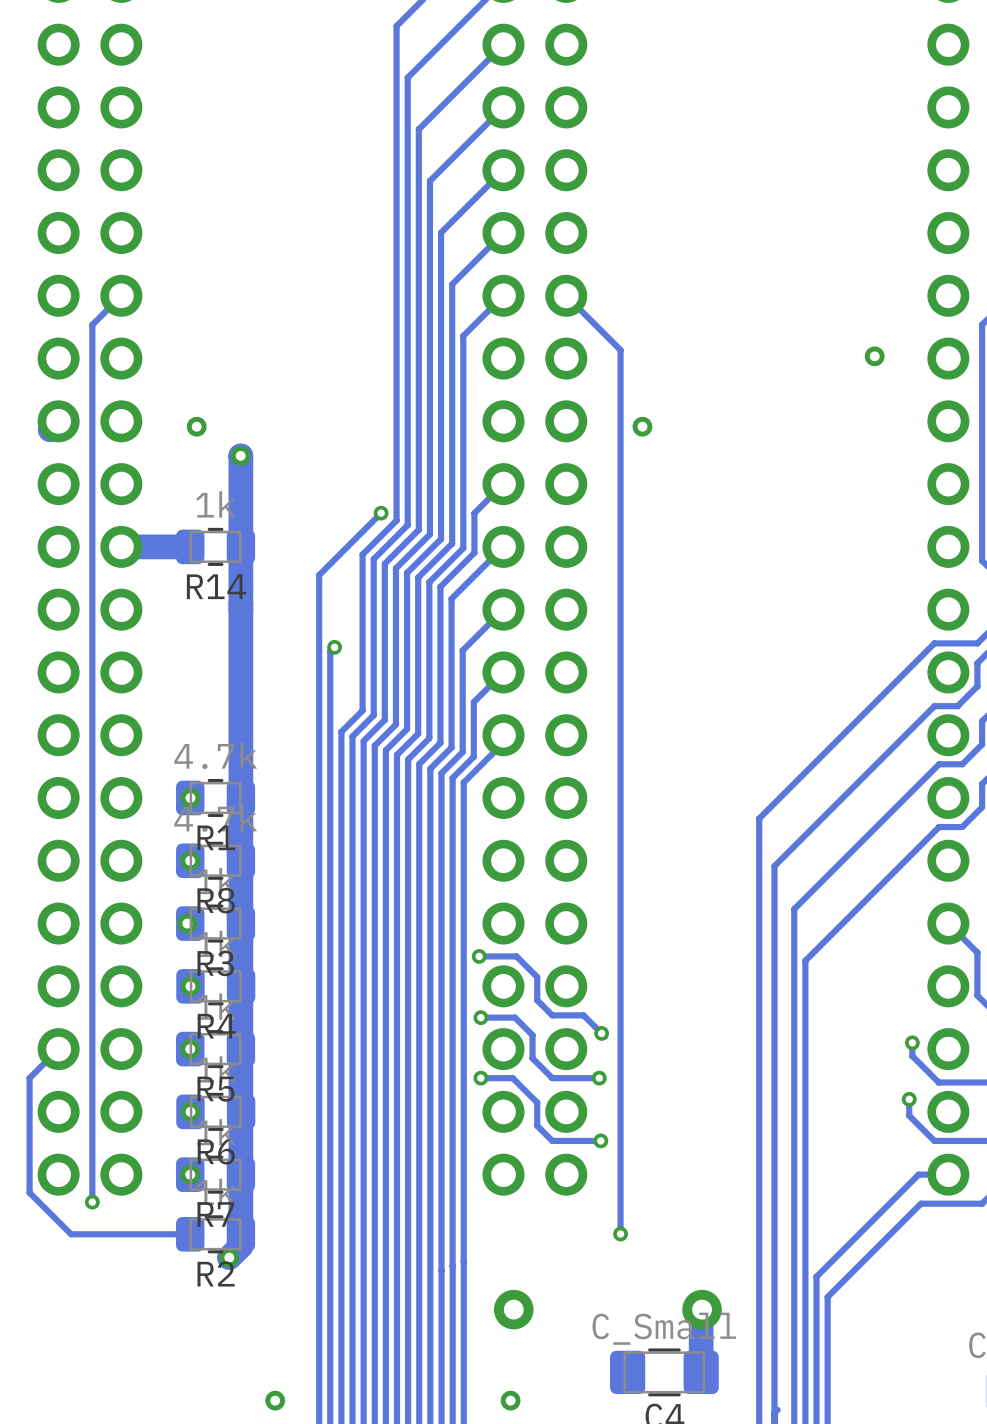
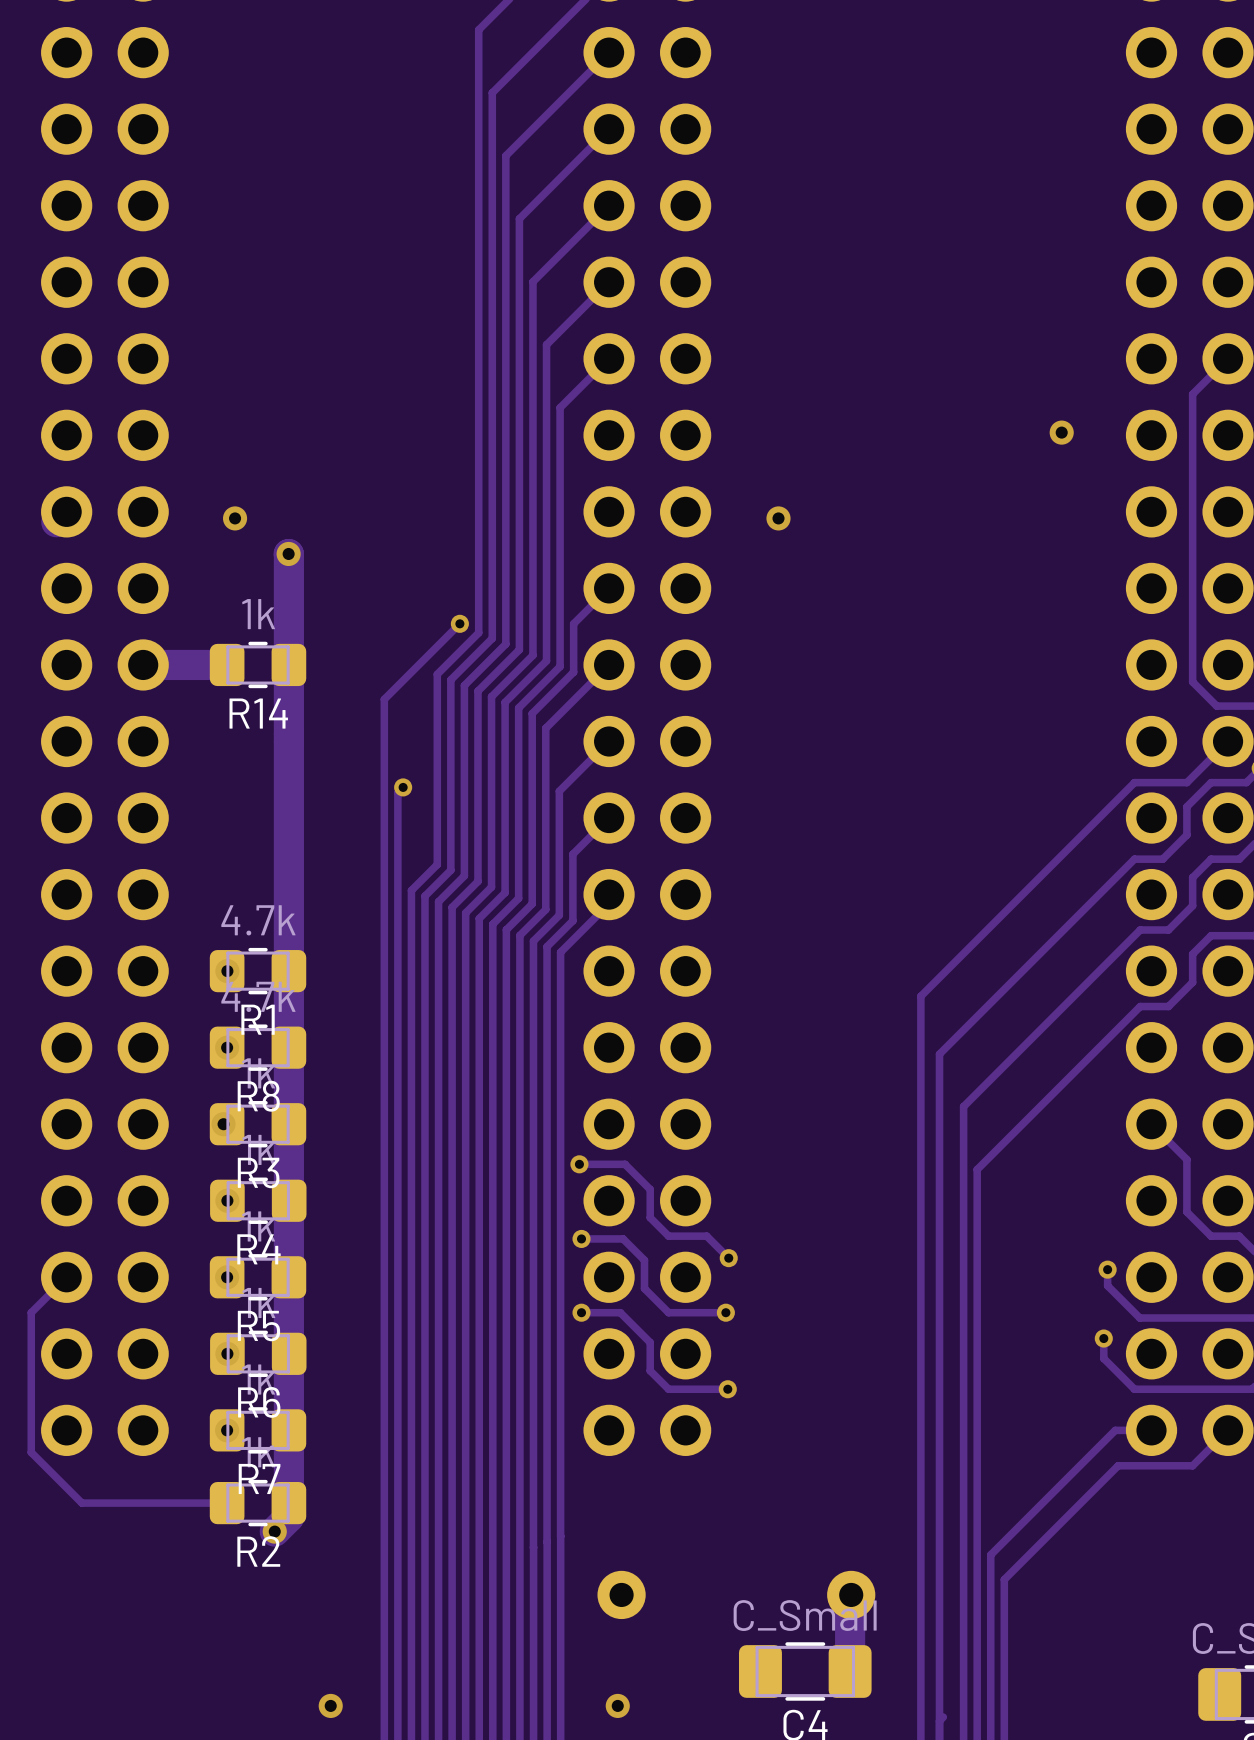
track: (121, 295) (92, 324) (92, 1202) -> none
track: (566, 295) (620, 350) (620, 1234) -> none
via: (92, 1202) -> none
via: (620, 1234) -> none

